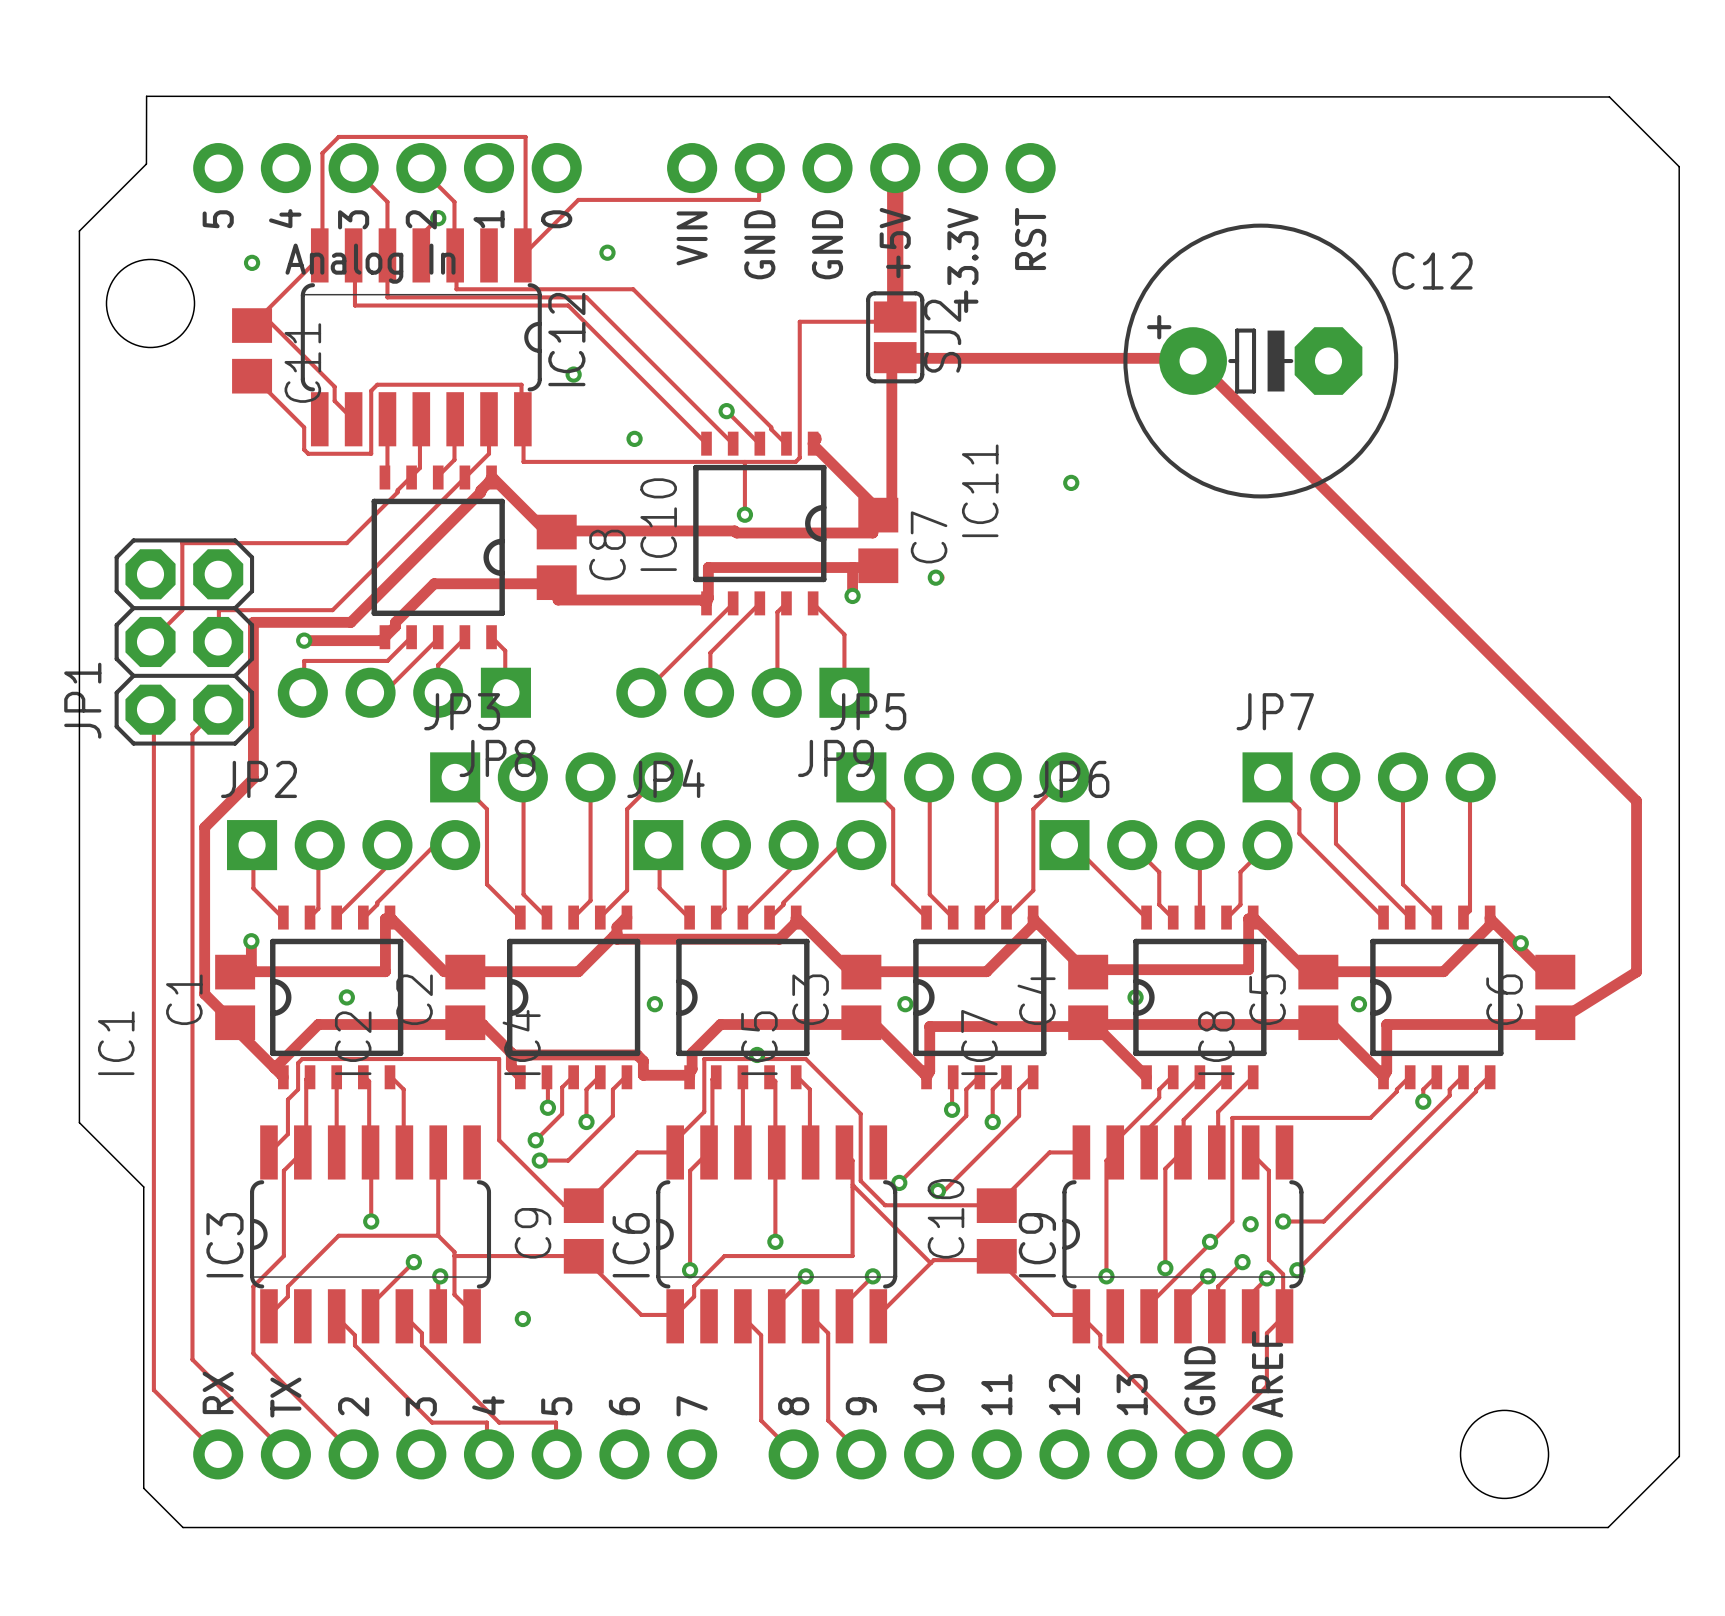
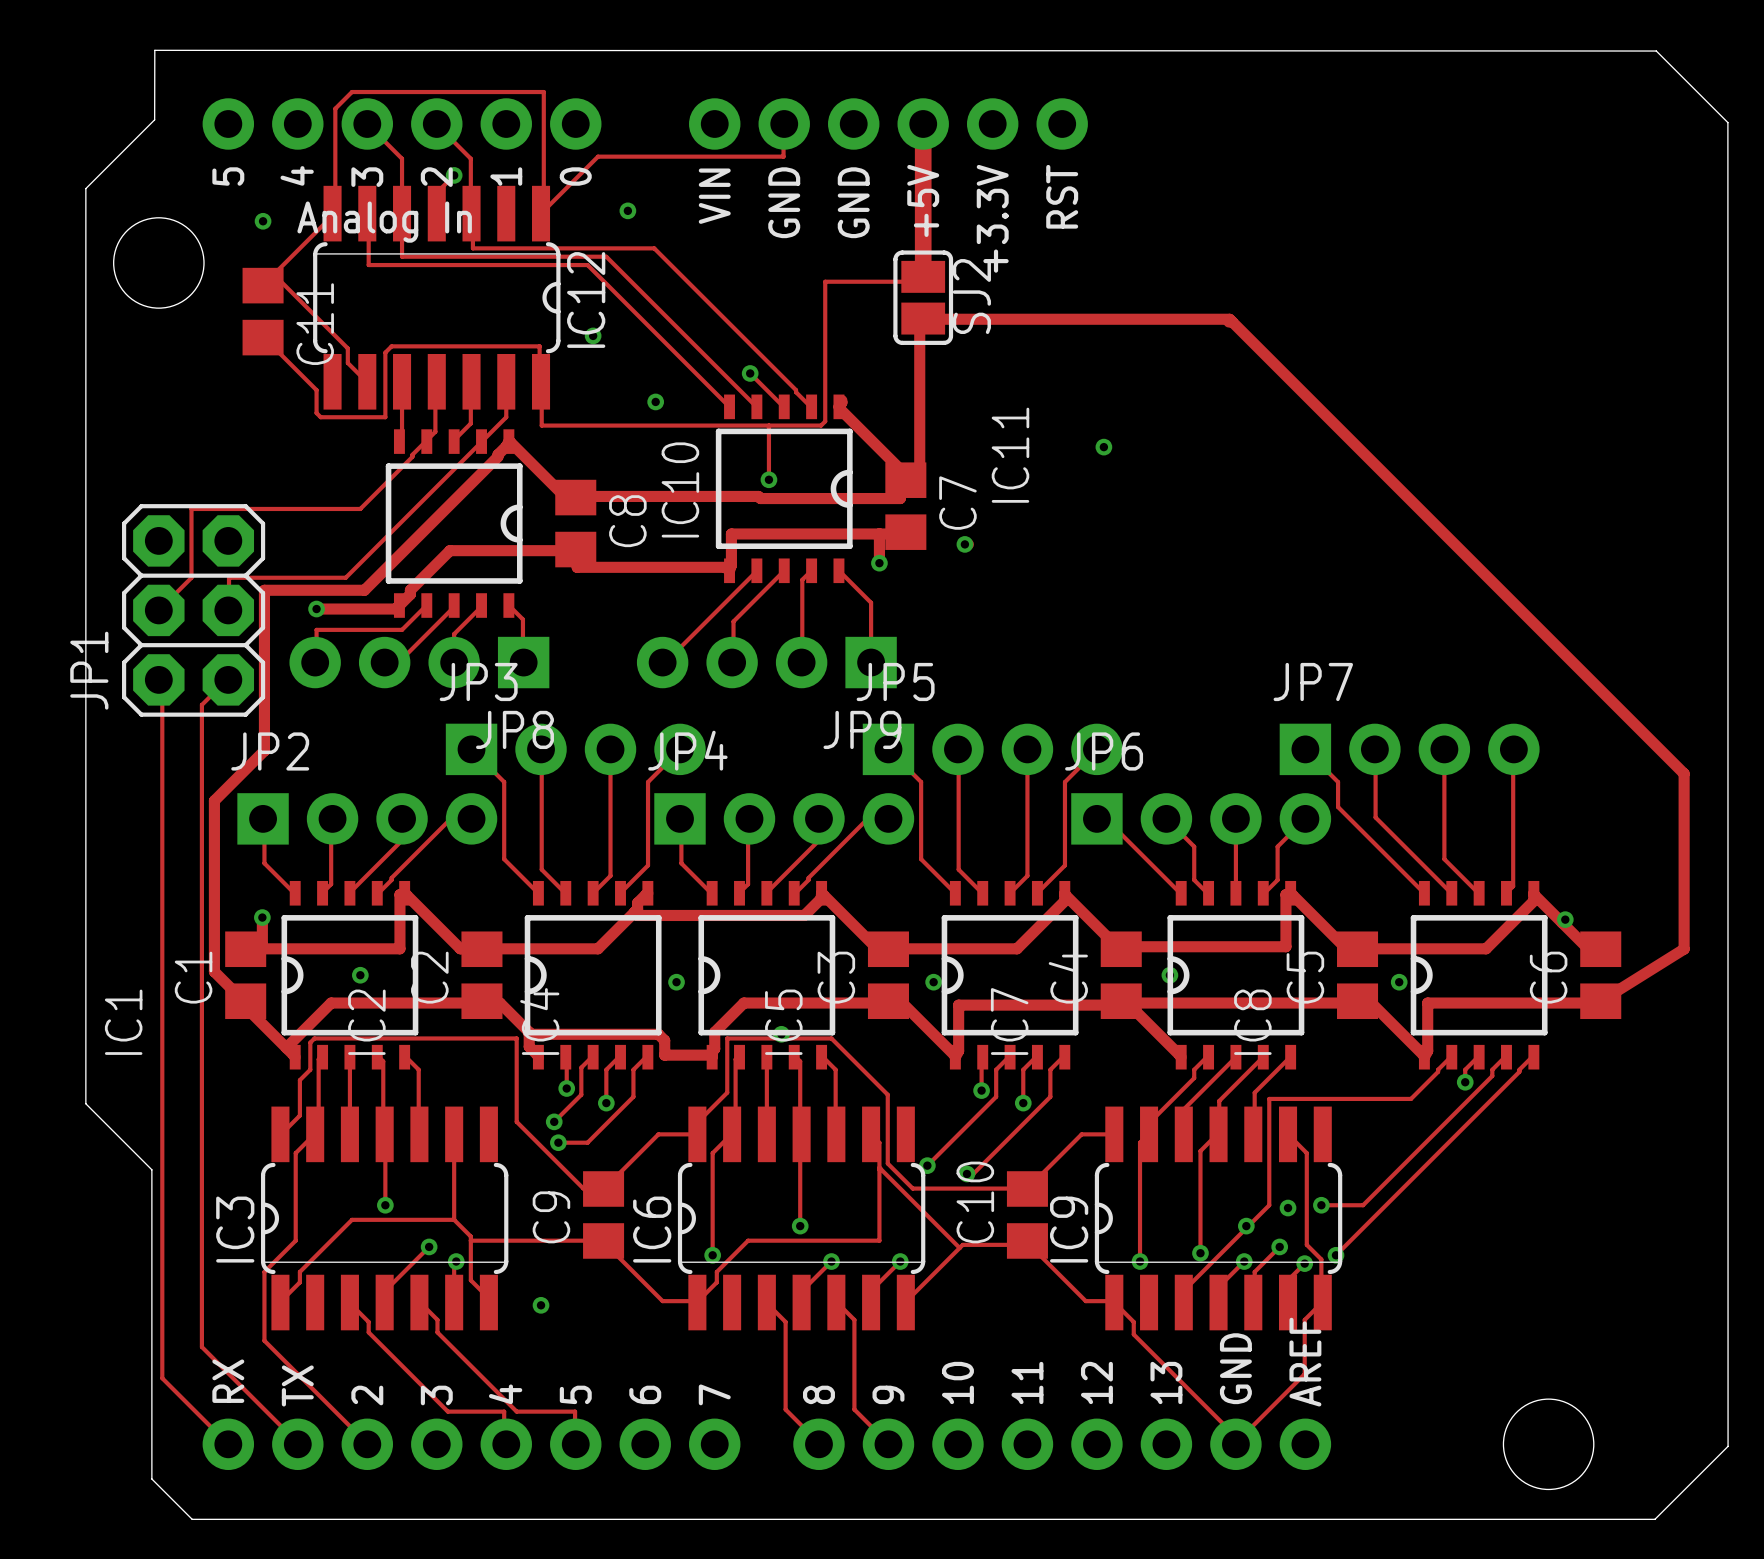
C12: (1260, 361) -> none

